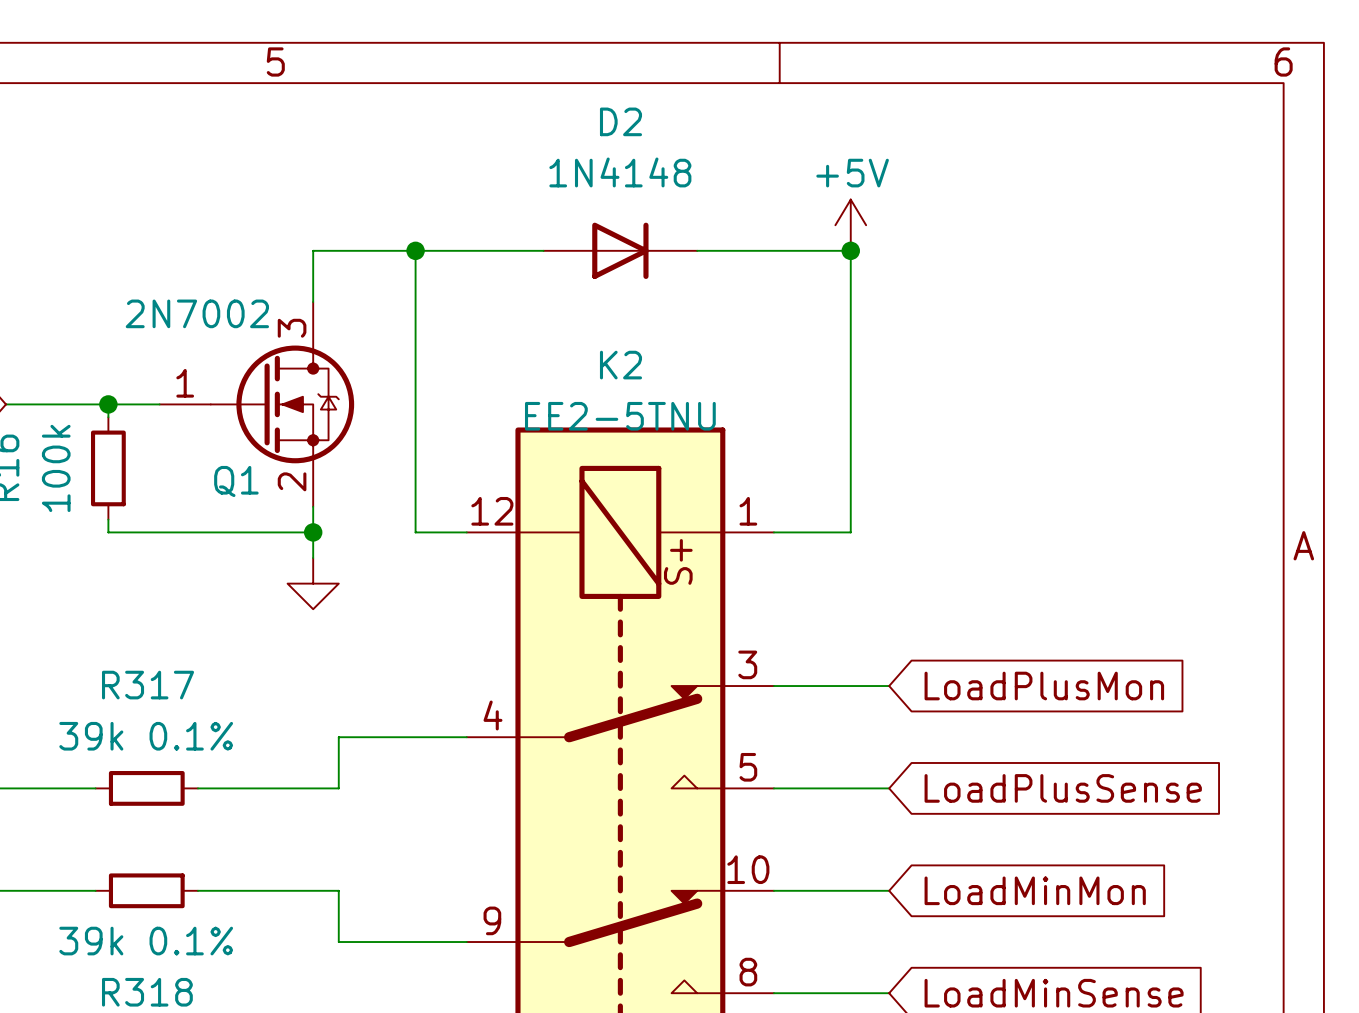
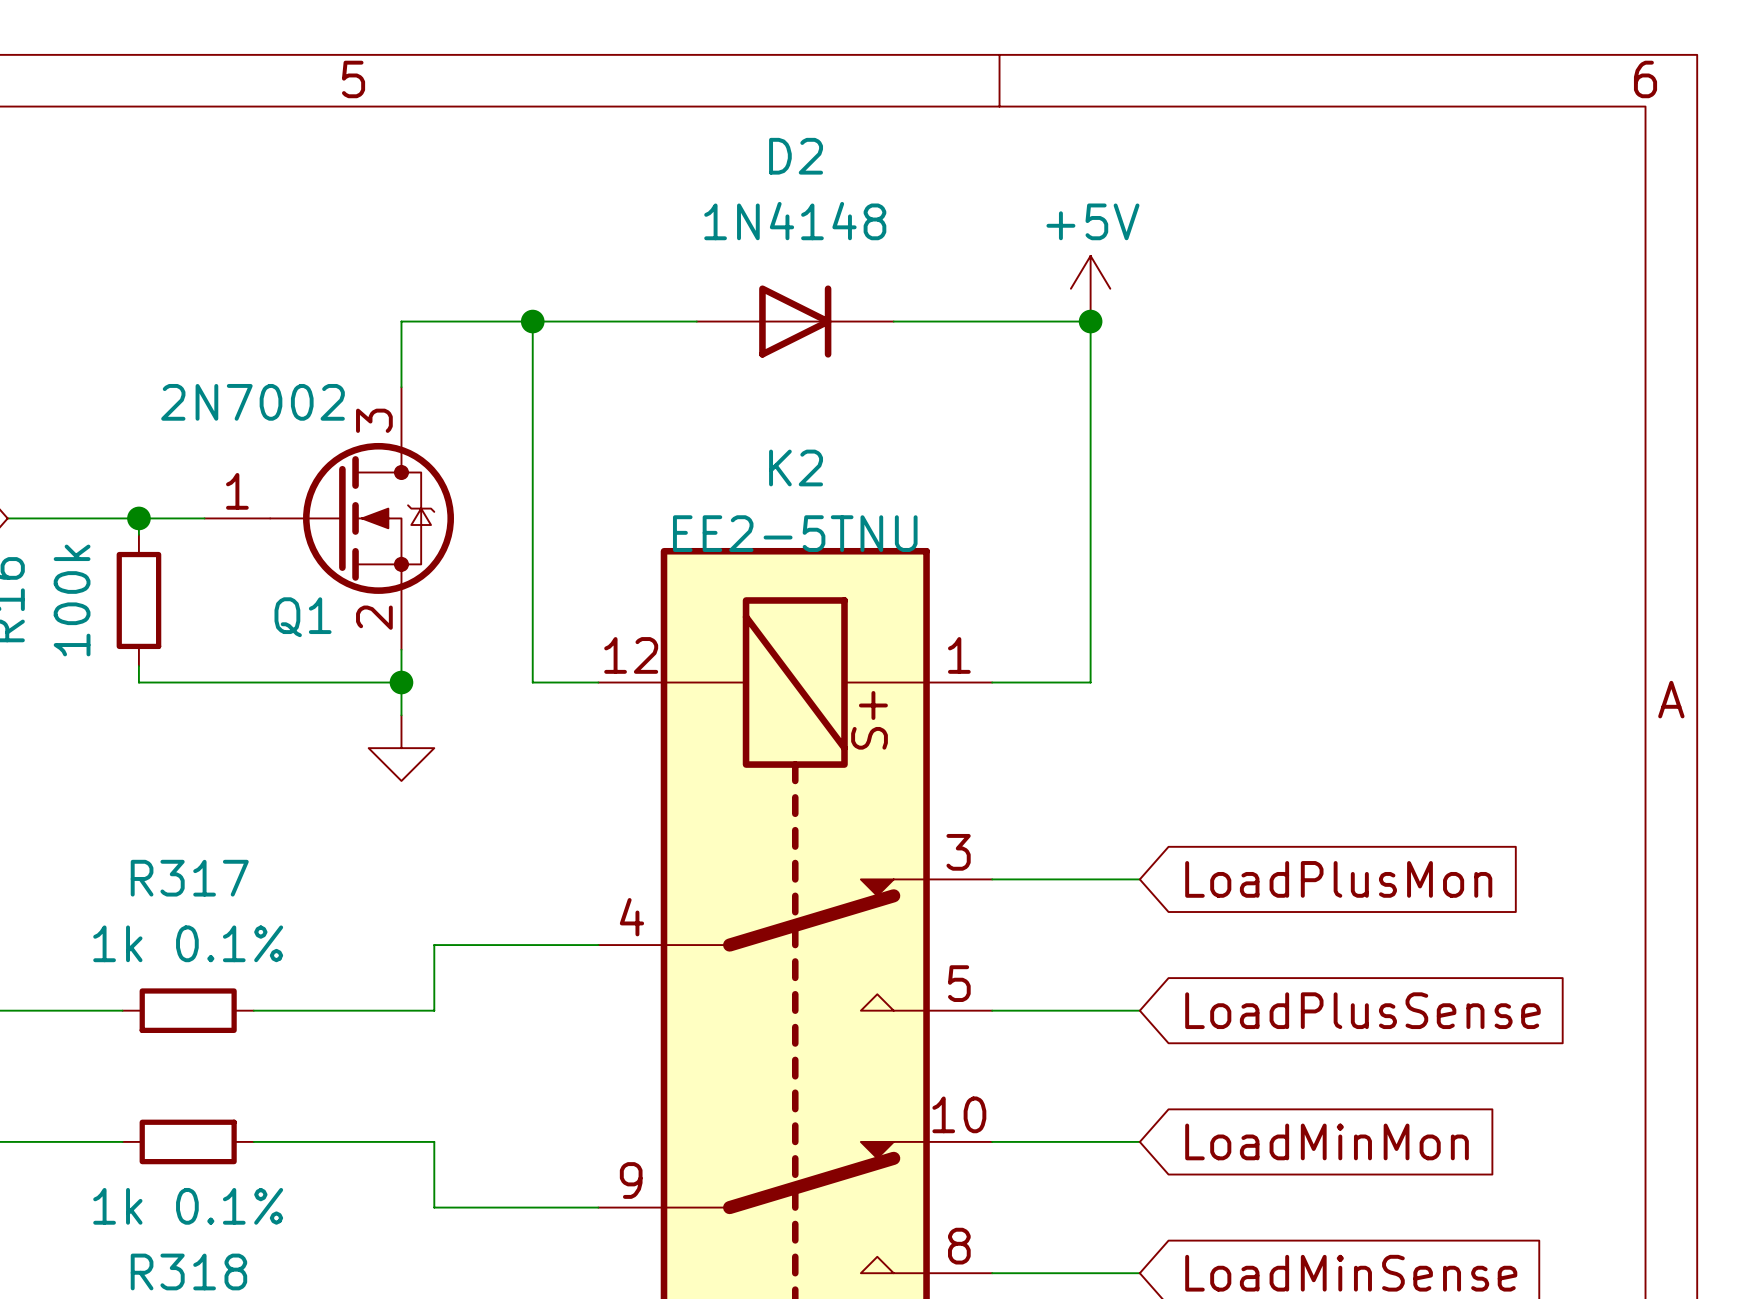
R317 value: 39k 0.1% (146, 736) -> 1k 0.1% (188, 943)
R318 value: 39k 0.1% (146, 941) -> 1k 0.1% (188, 1206)

